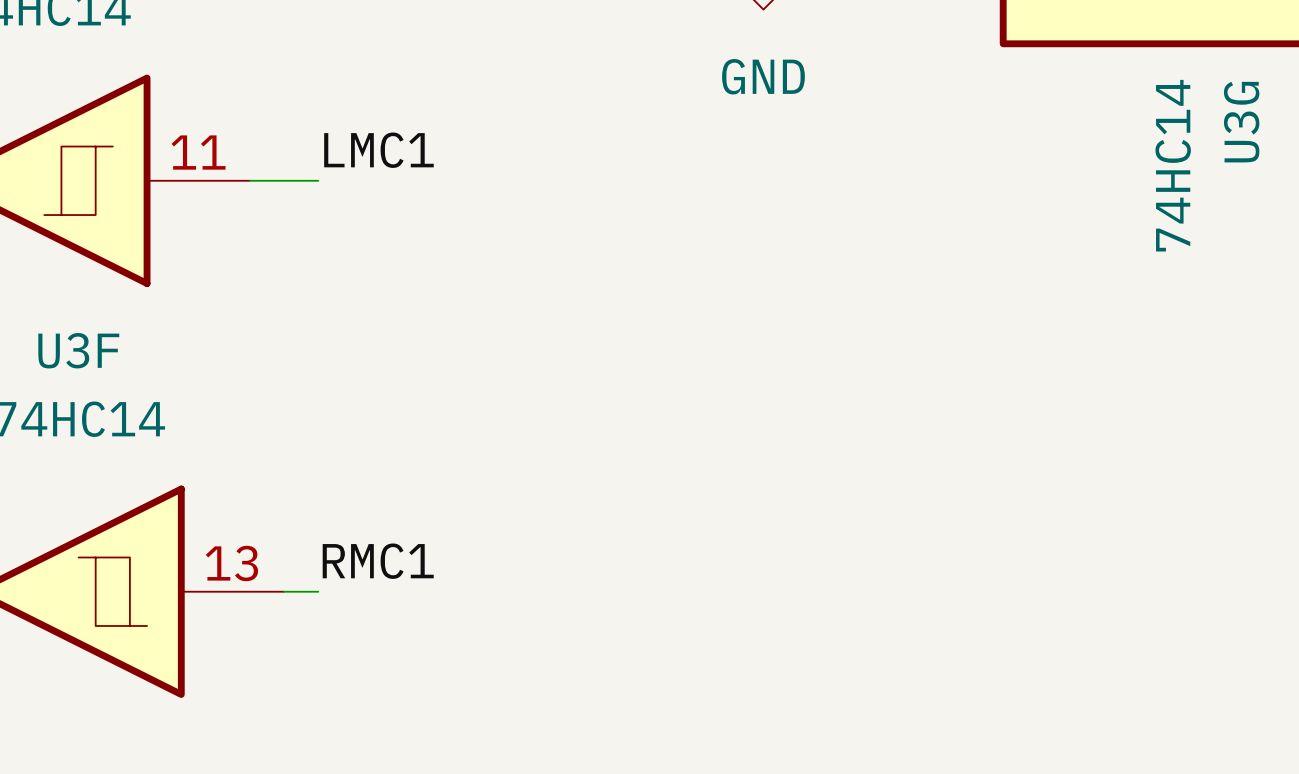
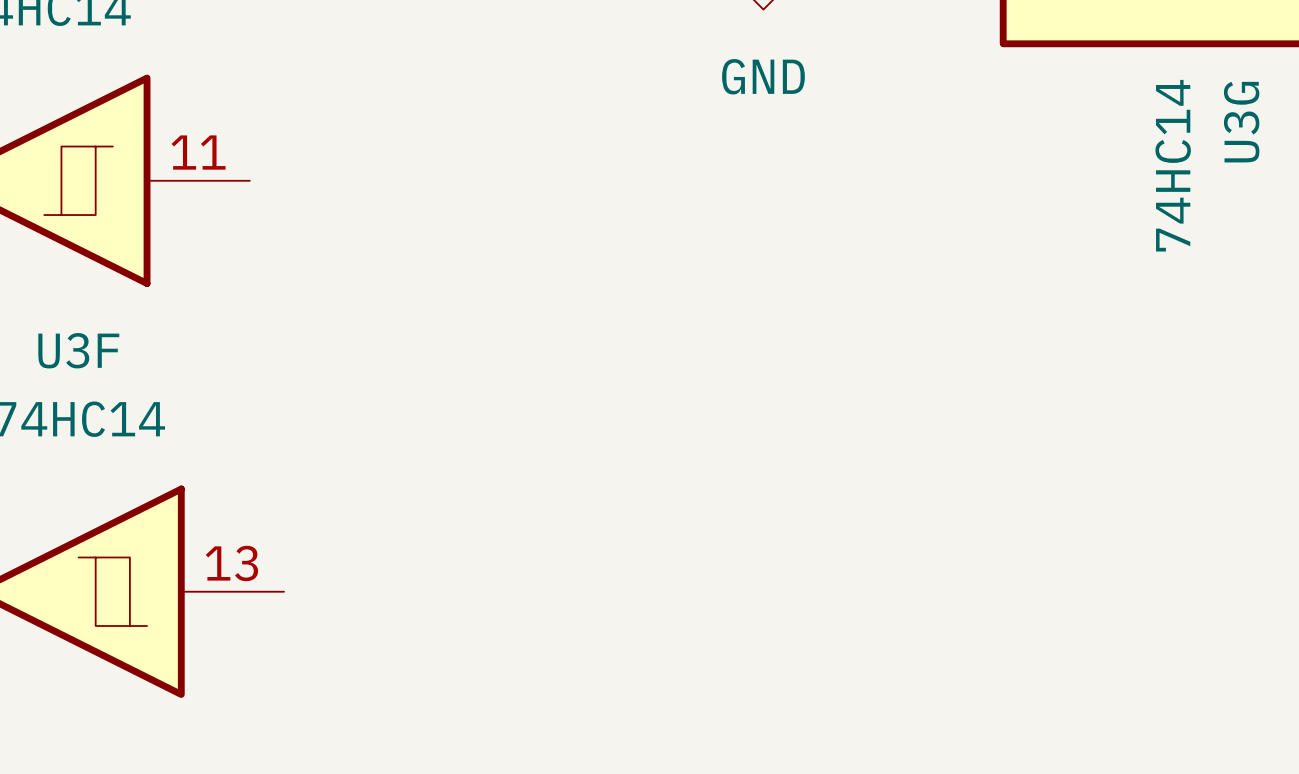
label: LMC1 (378, 150) -> none
wire: (249, 180) (318, 180) -> none
label: RMC1 (378, 561) -> none
wire: (284, 591) (318, 591) -> none

